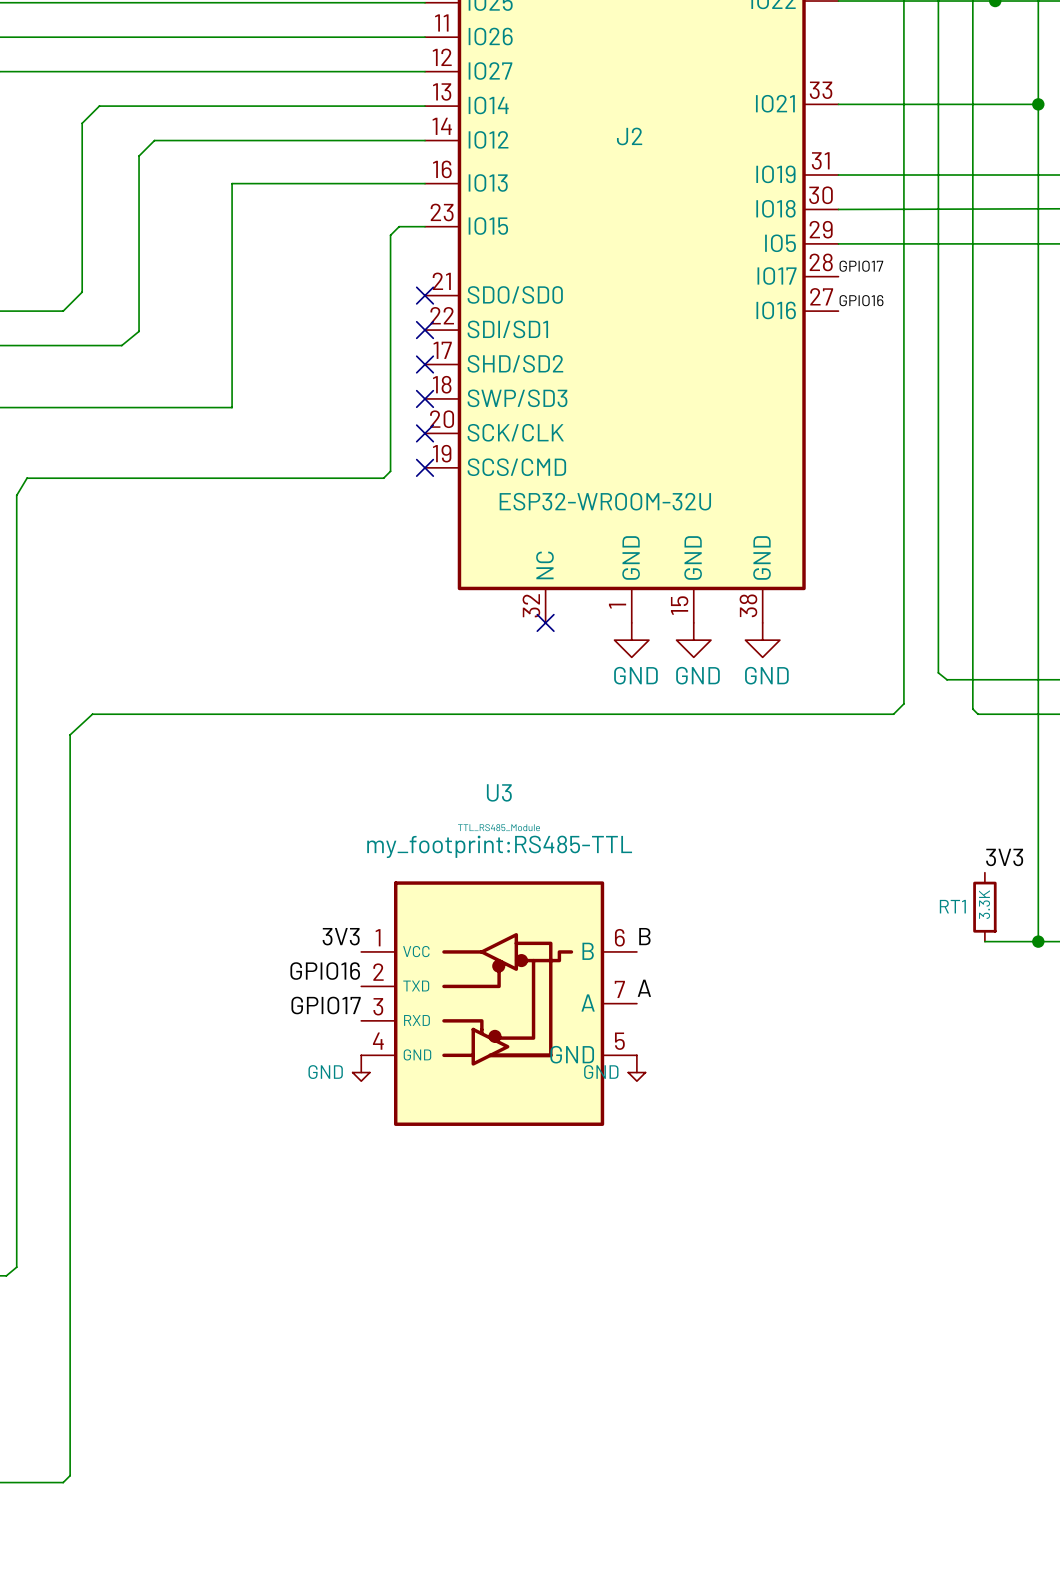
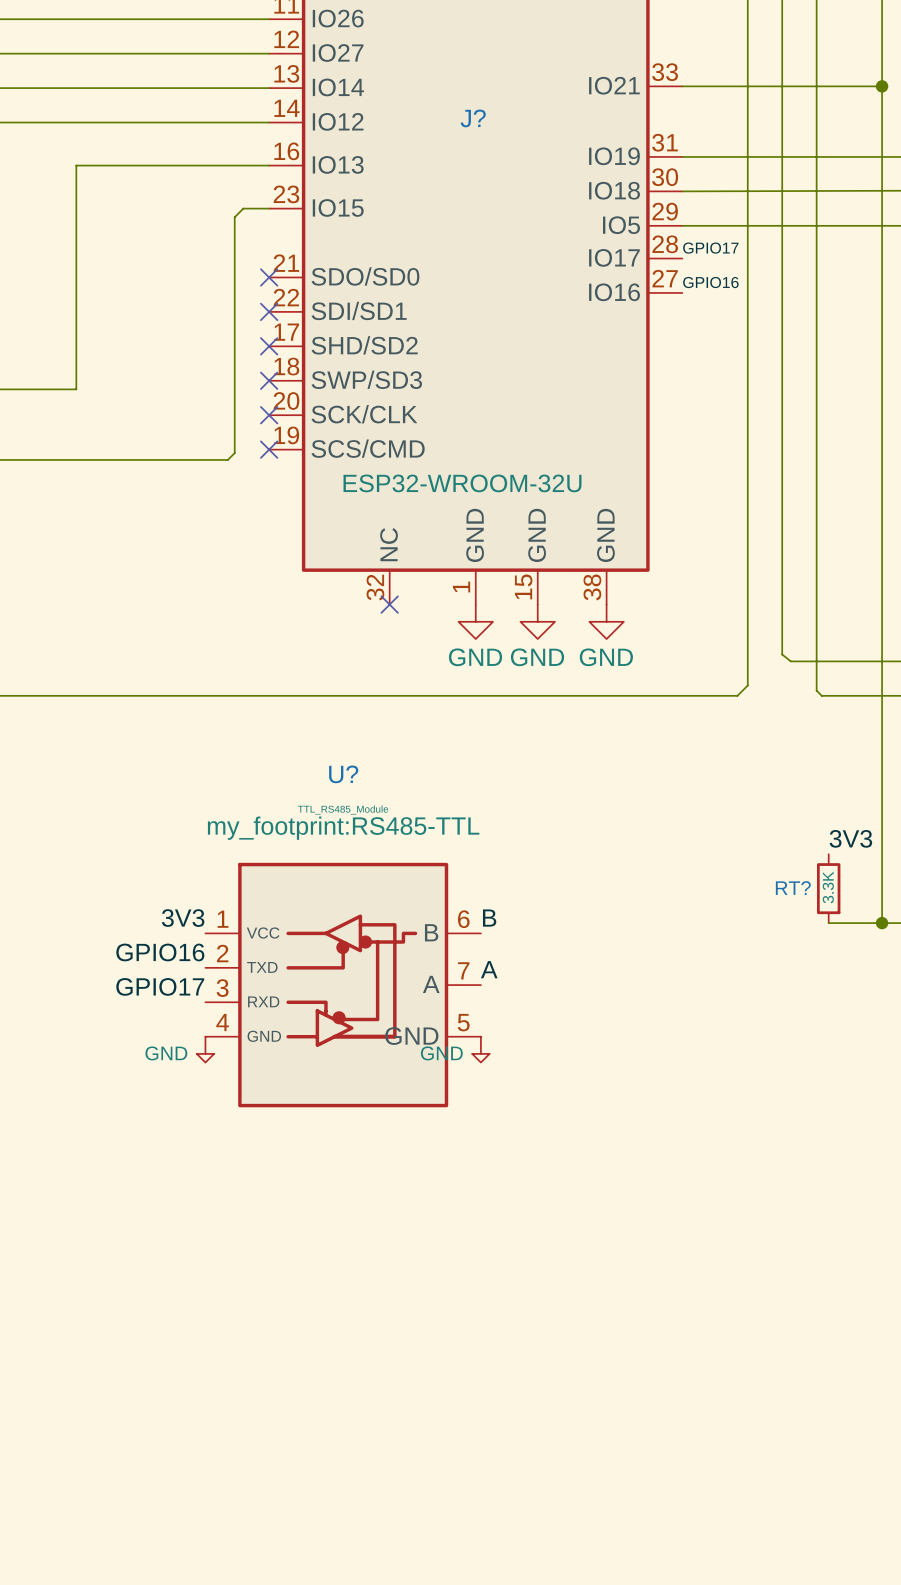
J2 name: J2 (629, 136) -> J? (473, 118)
U3 name: U3 (499, 792) -> U? (343, 774)
RT1 name: RT1 (952, 906) -> RT? (793, 888)

